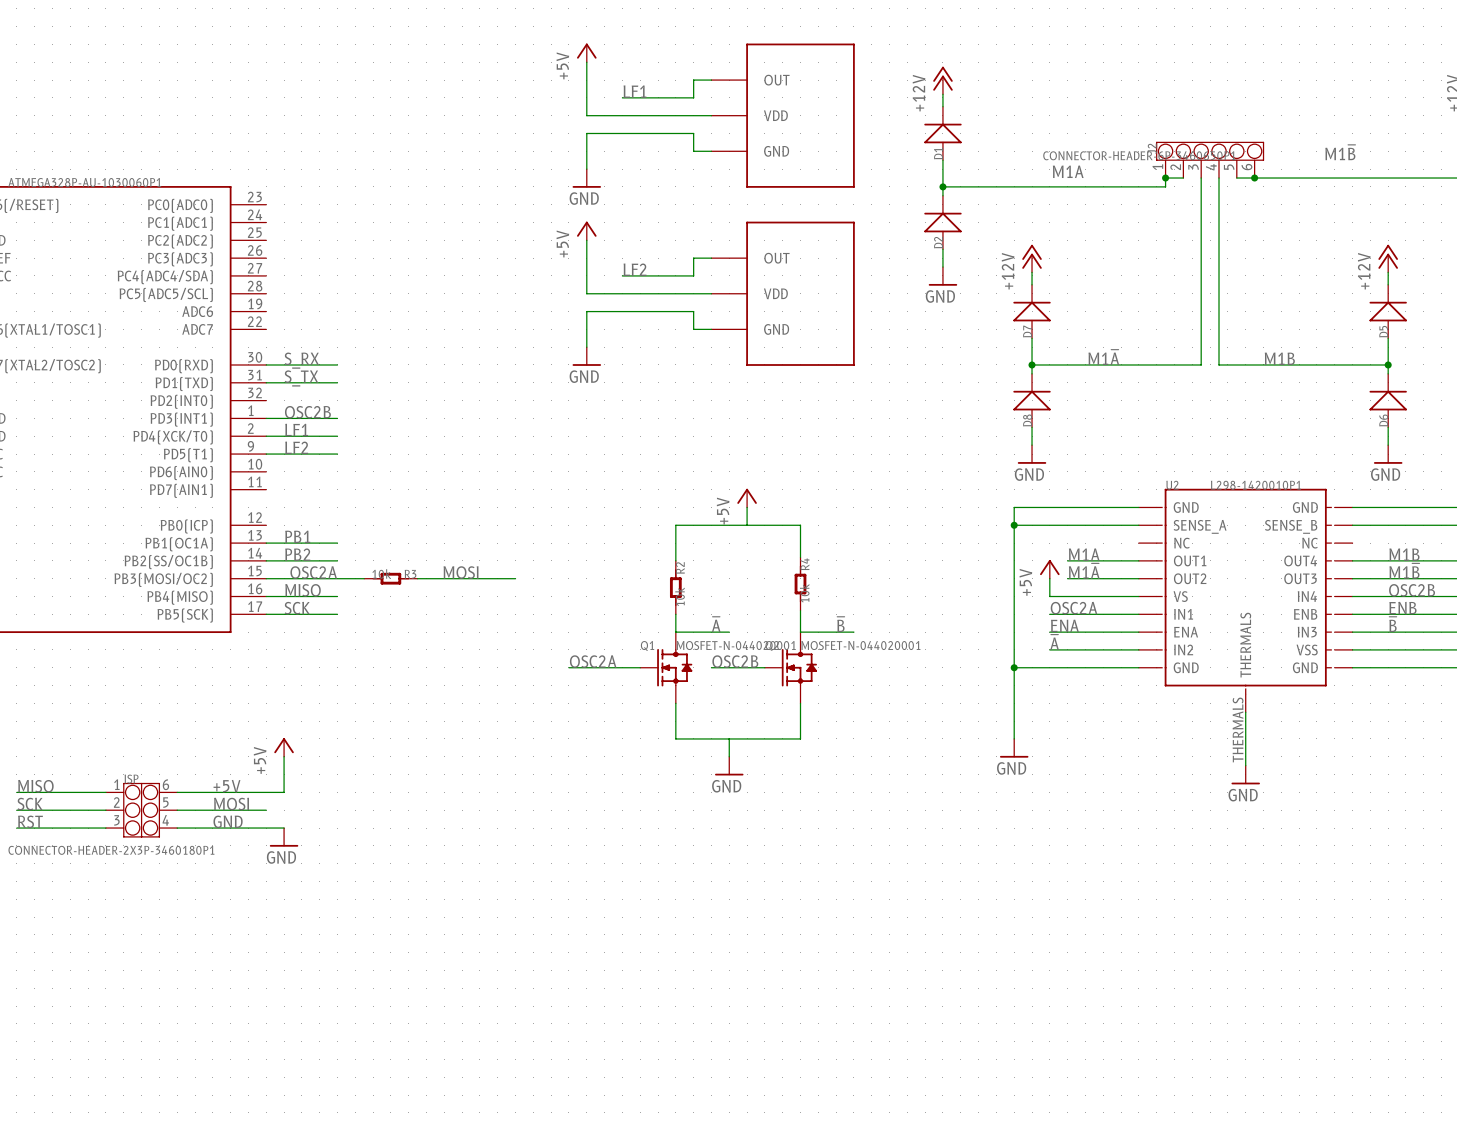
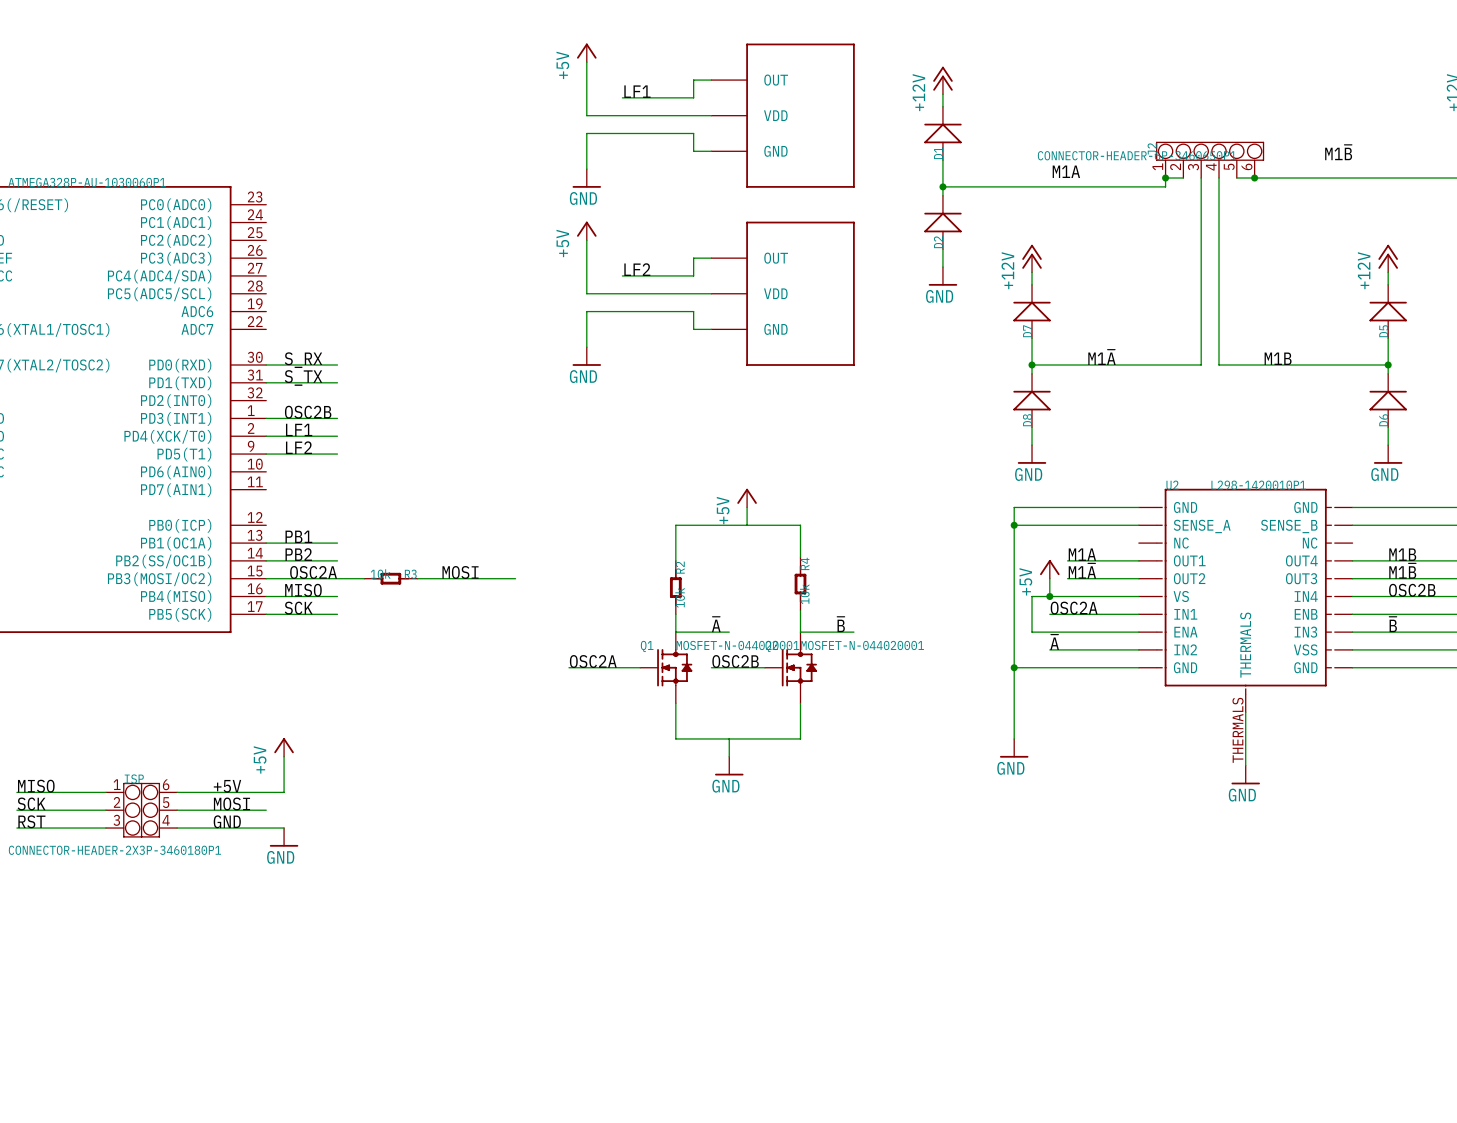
wire: none -> (1049, 596) (1032, 596) (1032, 632) (1049, 632)
junction: none -> (1049, 596)
label: ENB (1402, 608) -> none
label: ENA (1064, 625) -> none

